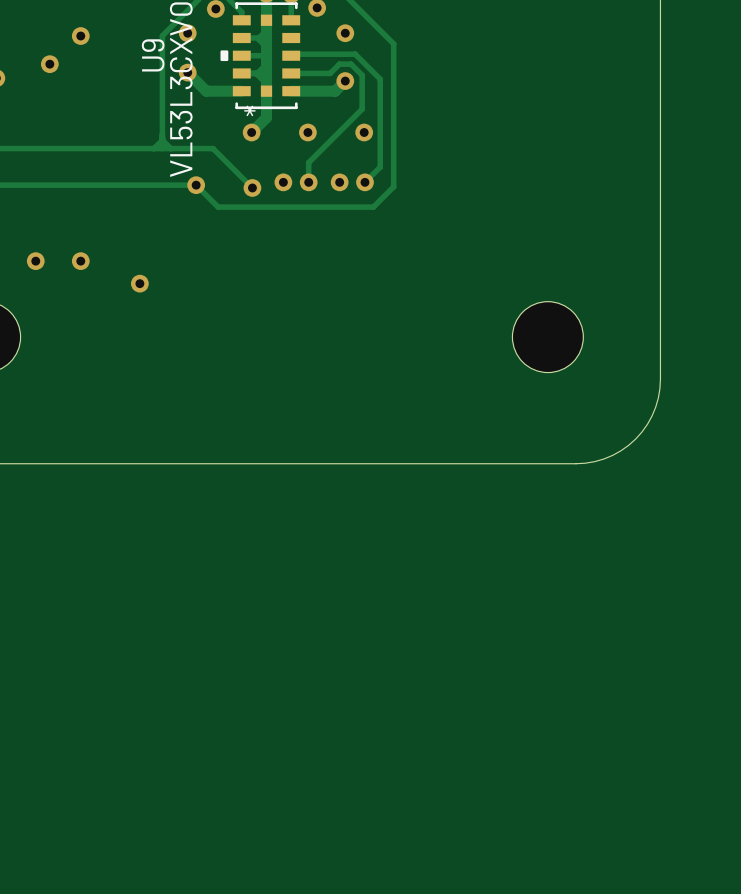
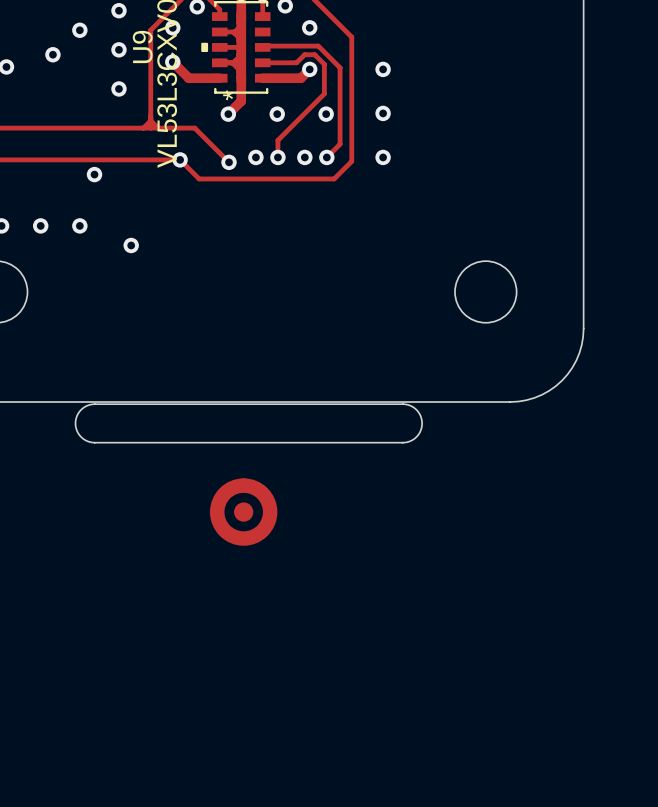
via: none -> (118, 10)
via: none -> (118, 49)
via: none -> (383, 69)
via: none -> (118, 88)
via: none -> (383, 113)
via: none -> (383, 157)
via: none -> (94, 174)
board edge: none -> (94, 404) (405, 404) (417, 410) (420, 416) (421, 425) (415, 437) (402, 442) (92, 442) (79, 435) (75, 423) (81, 409) (94, 404)
part: none -> (243, 512)

